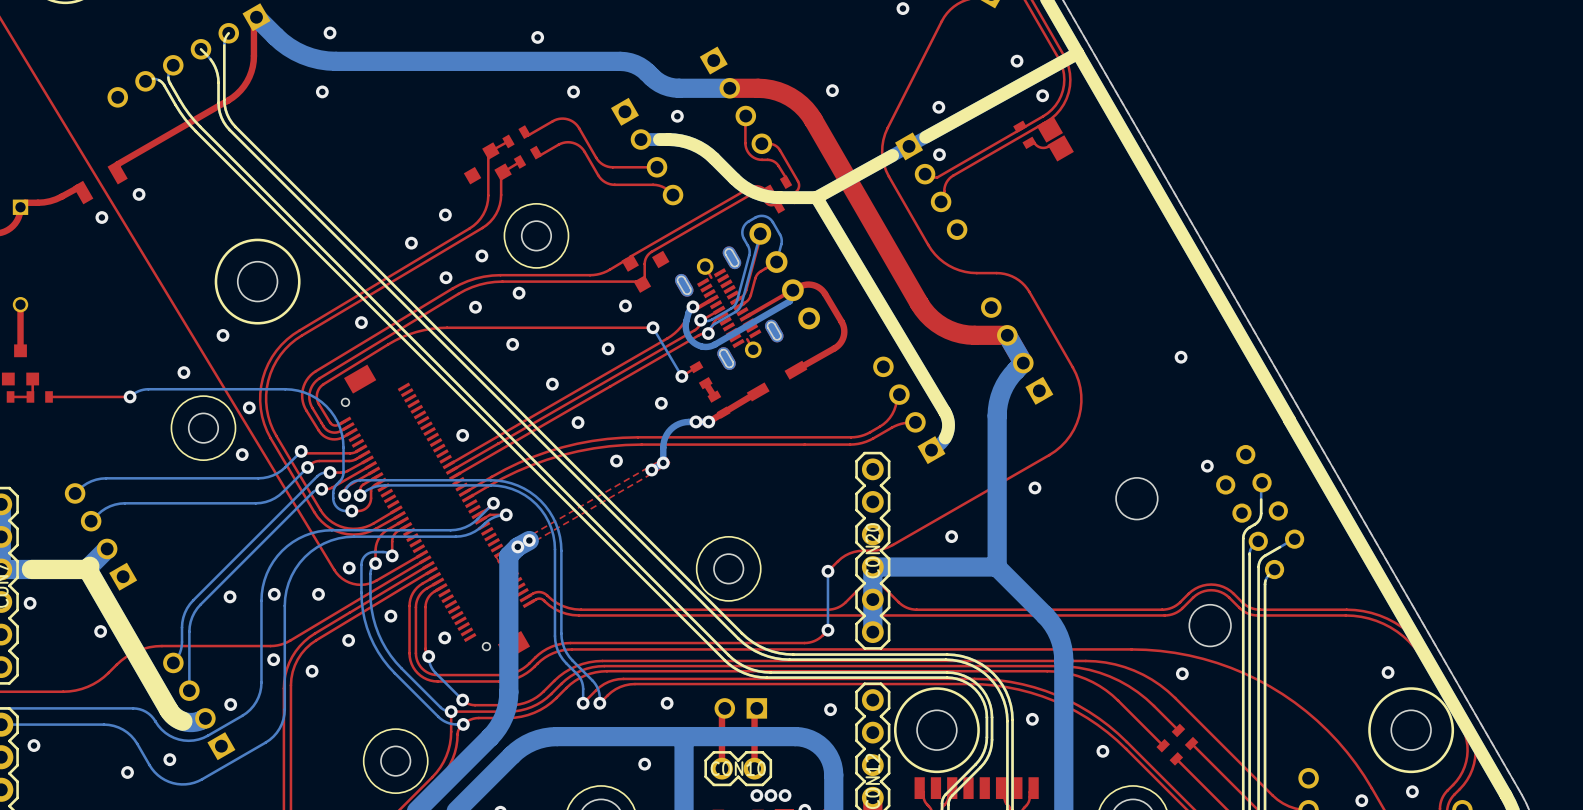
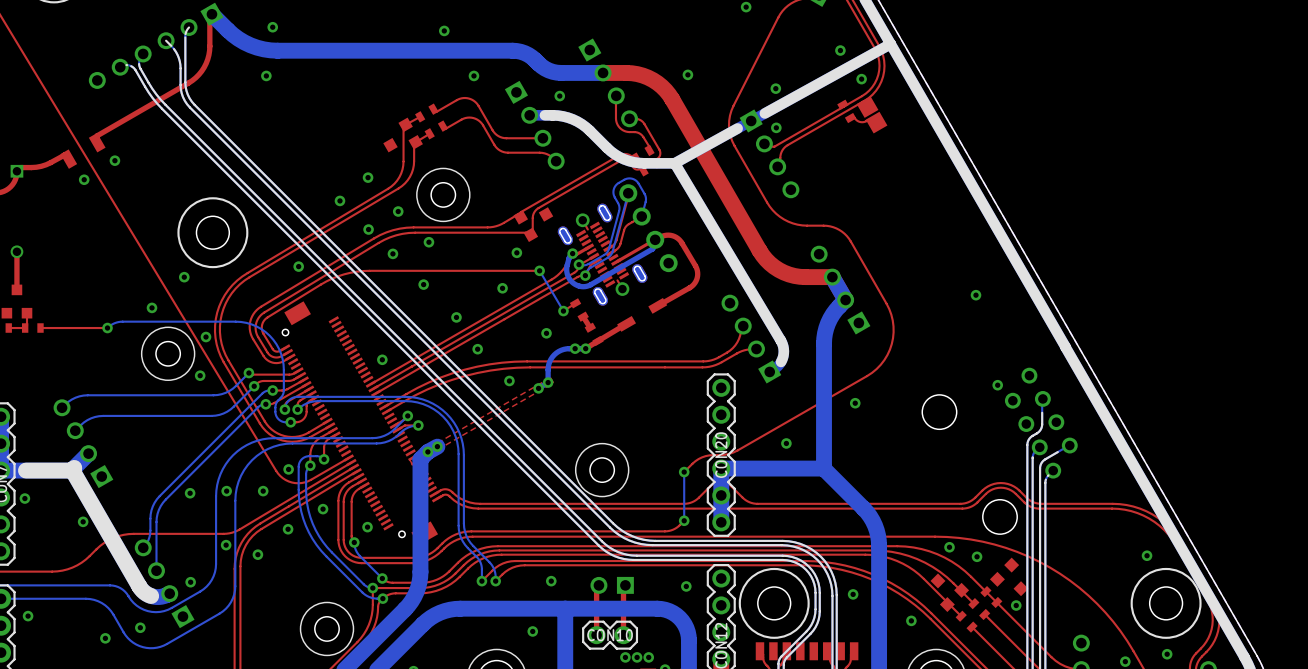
via: none -> (949, 547)
part: none -> (1009, 576)
part: none -> (949, 592)
part: none -> (991, 597)
via: none -> (1016, 605)

